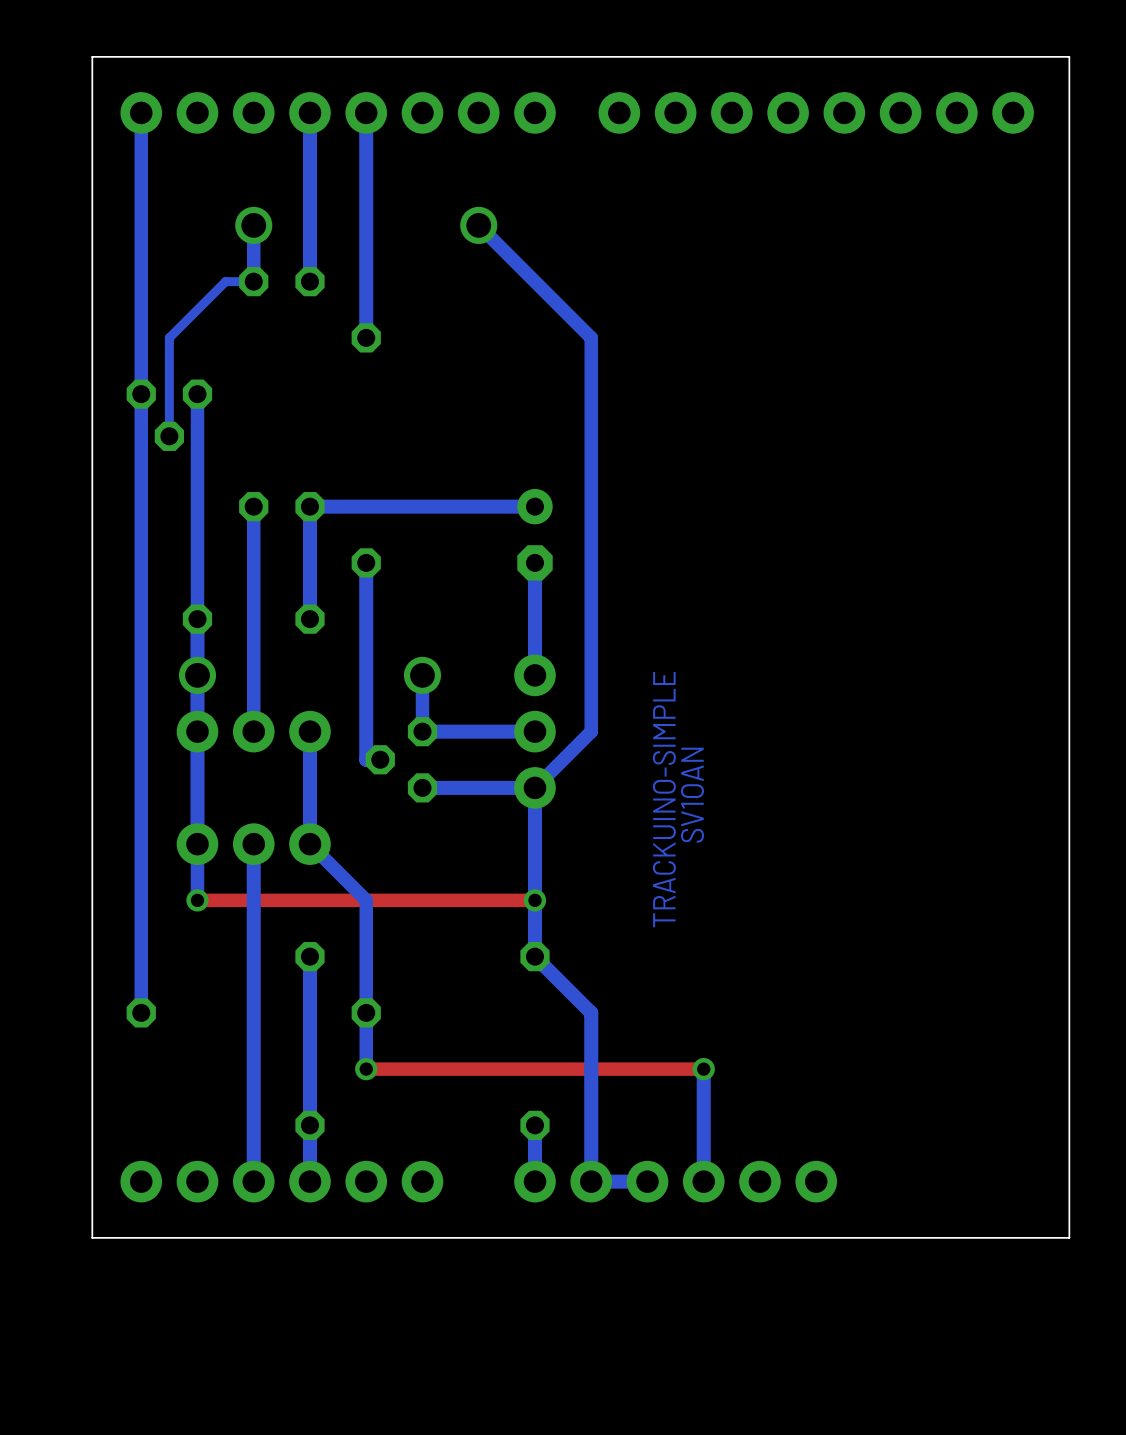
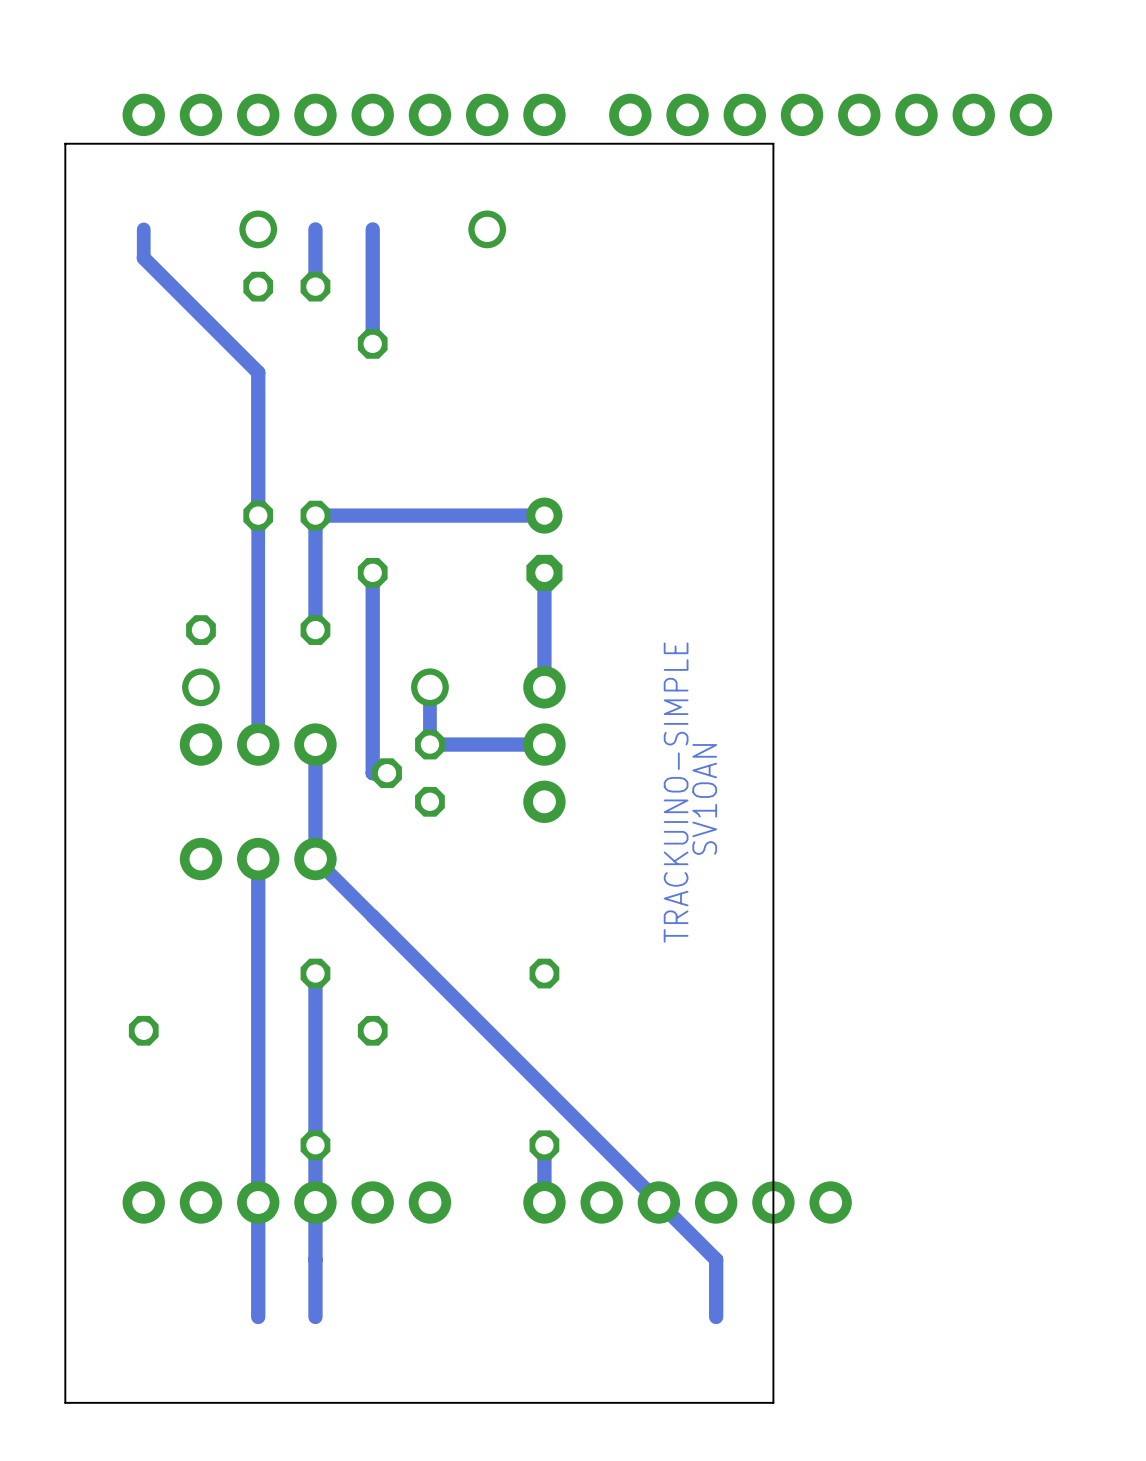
board edge: (1069, 56) (92, 56) (92, 1237) (1069, 1237) (1069, 56) -> (773, 143) (773, 1402) (65, 1402) (65, 143) (773, 143)
bottom track: (141, 112) (141, 225) -> none
bottom track: (309, 112) (309, 225) -> none
bottom track: (366, 112) (366, 225) -> none
bottom track: (253, 225) (253, 281) (225, 281) (169, 337) (169, 436) -> none
bottom track: (478, 225) (591, 337) (591, 731) (534, 787) -> none
bottom track: (141, 253) (141, 1012) -> (143, 258) (258, 372) (258, 515)
bottom track: (197, 394) (197, 900) -> none
part: (169, 415) -> none
bottom track: (534, 787) (534, 956) (591, 1012) (591, 1181) (647, 1181) -> none
bottom track: (534, 787) (422, 787) -> none
via: (197, 900) -> none
bottom track: (366, 900) (366, 1069) -> (372, 916) (716, 1259) (716, 1316)
top track: (534, 900) (197, 900) -> none
via: (534, 900) -> none
via: (366, 1069) -> none
bottom track: (703, 1069) (703, 1181) -> (315, 1202) (315, 1316)
top track: (703, 1069) (366, 1069) -> none
via: (703, 1069) -> none
bottom track: none -> (258, 1202) (258, 1316)

